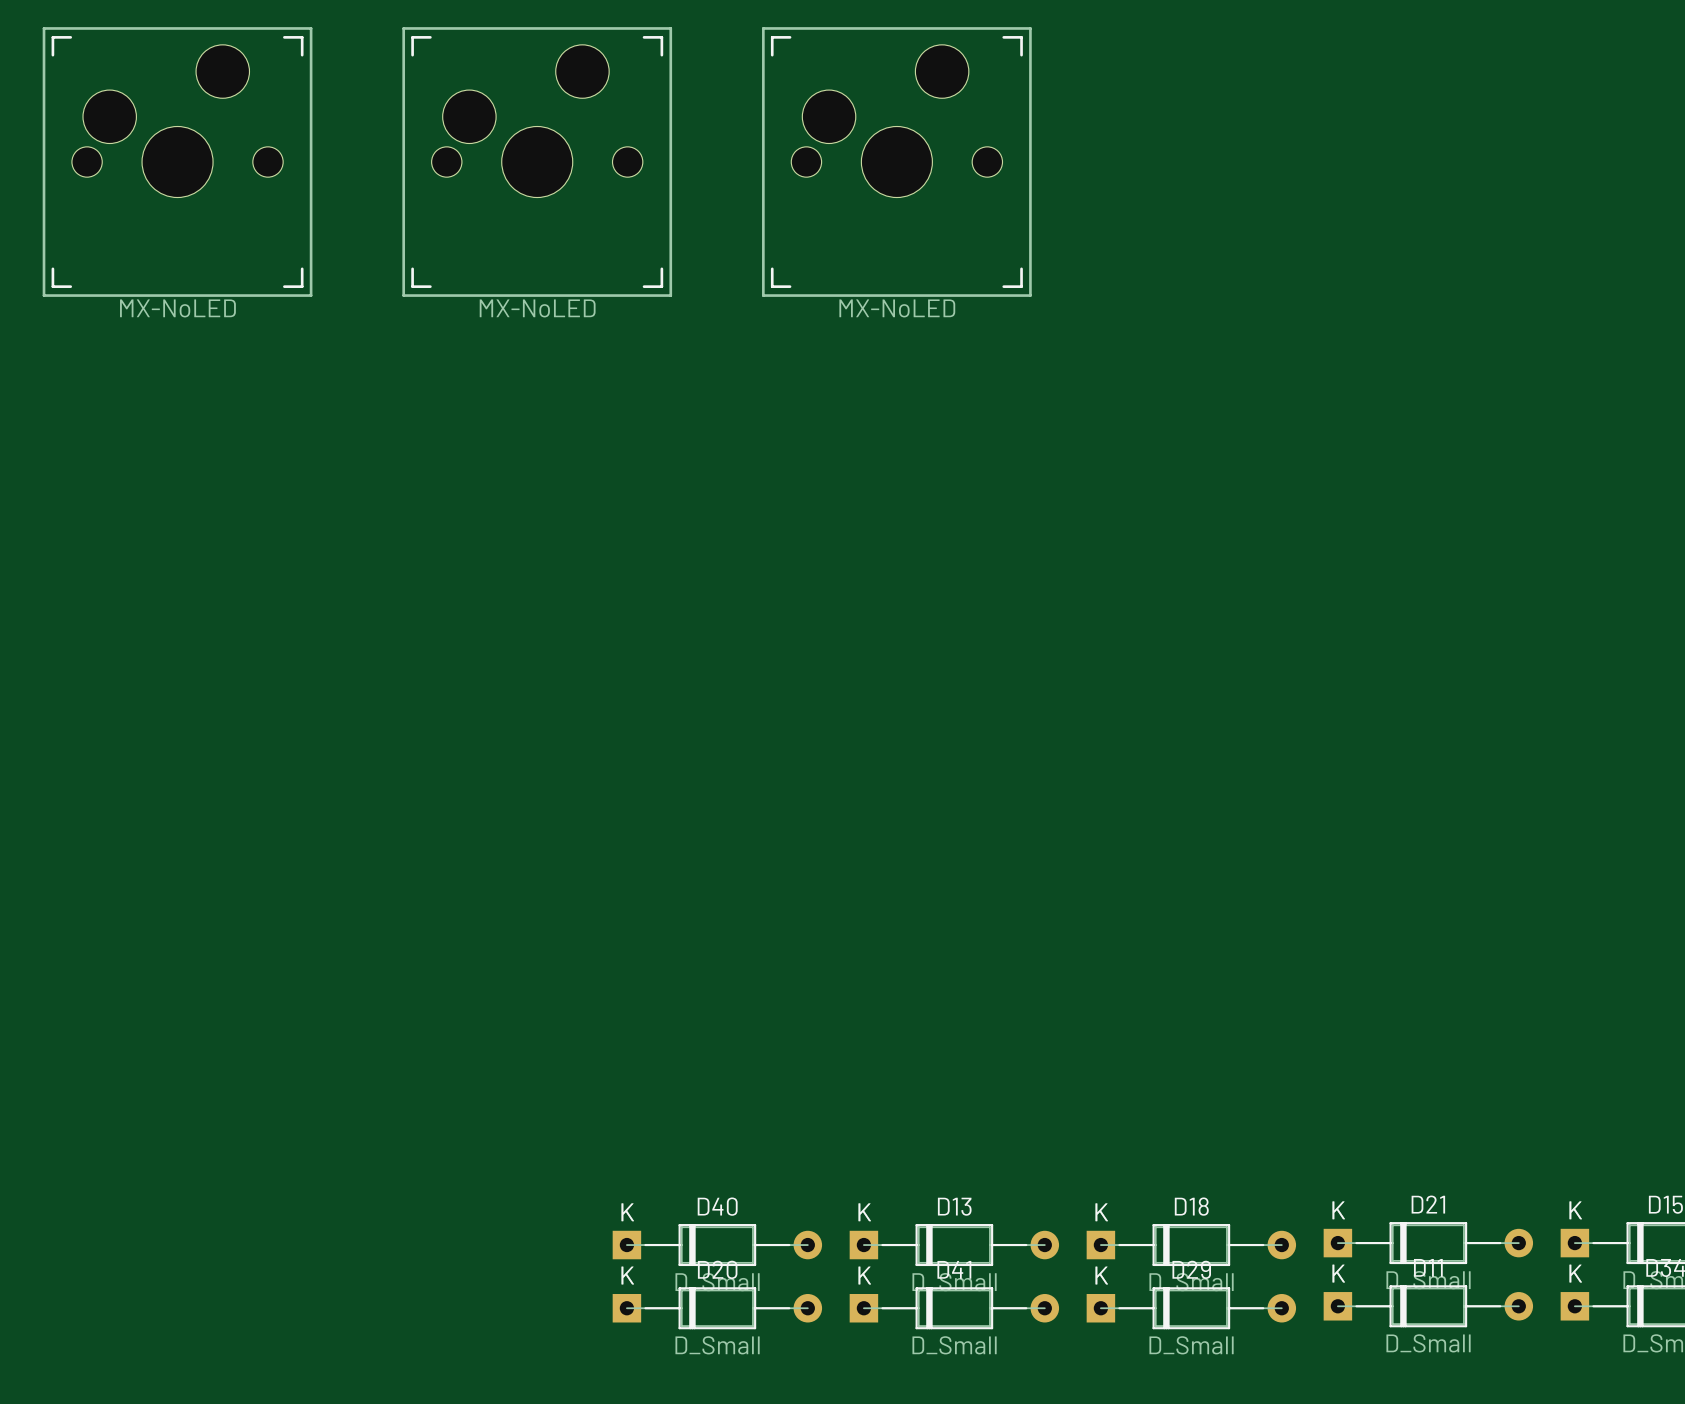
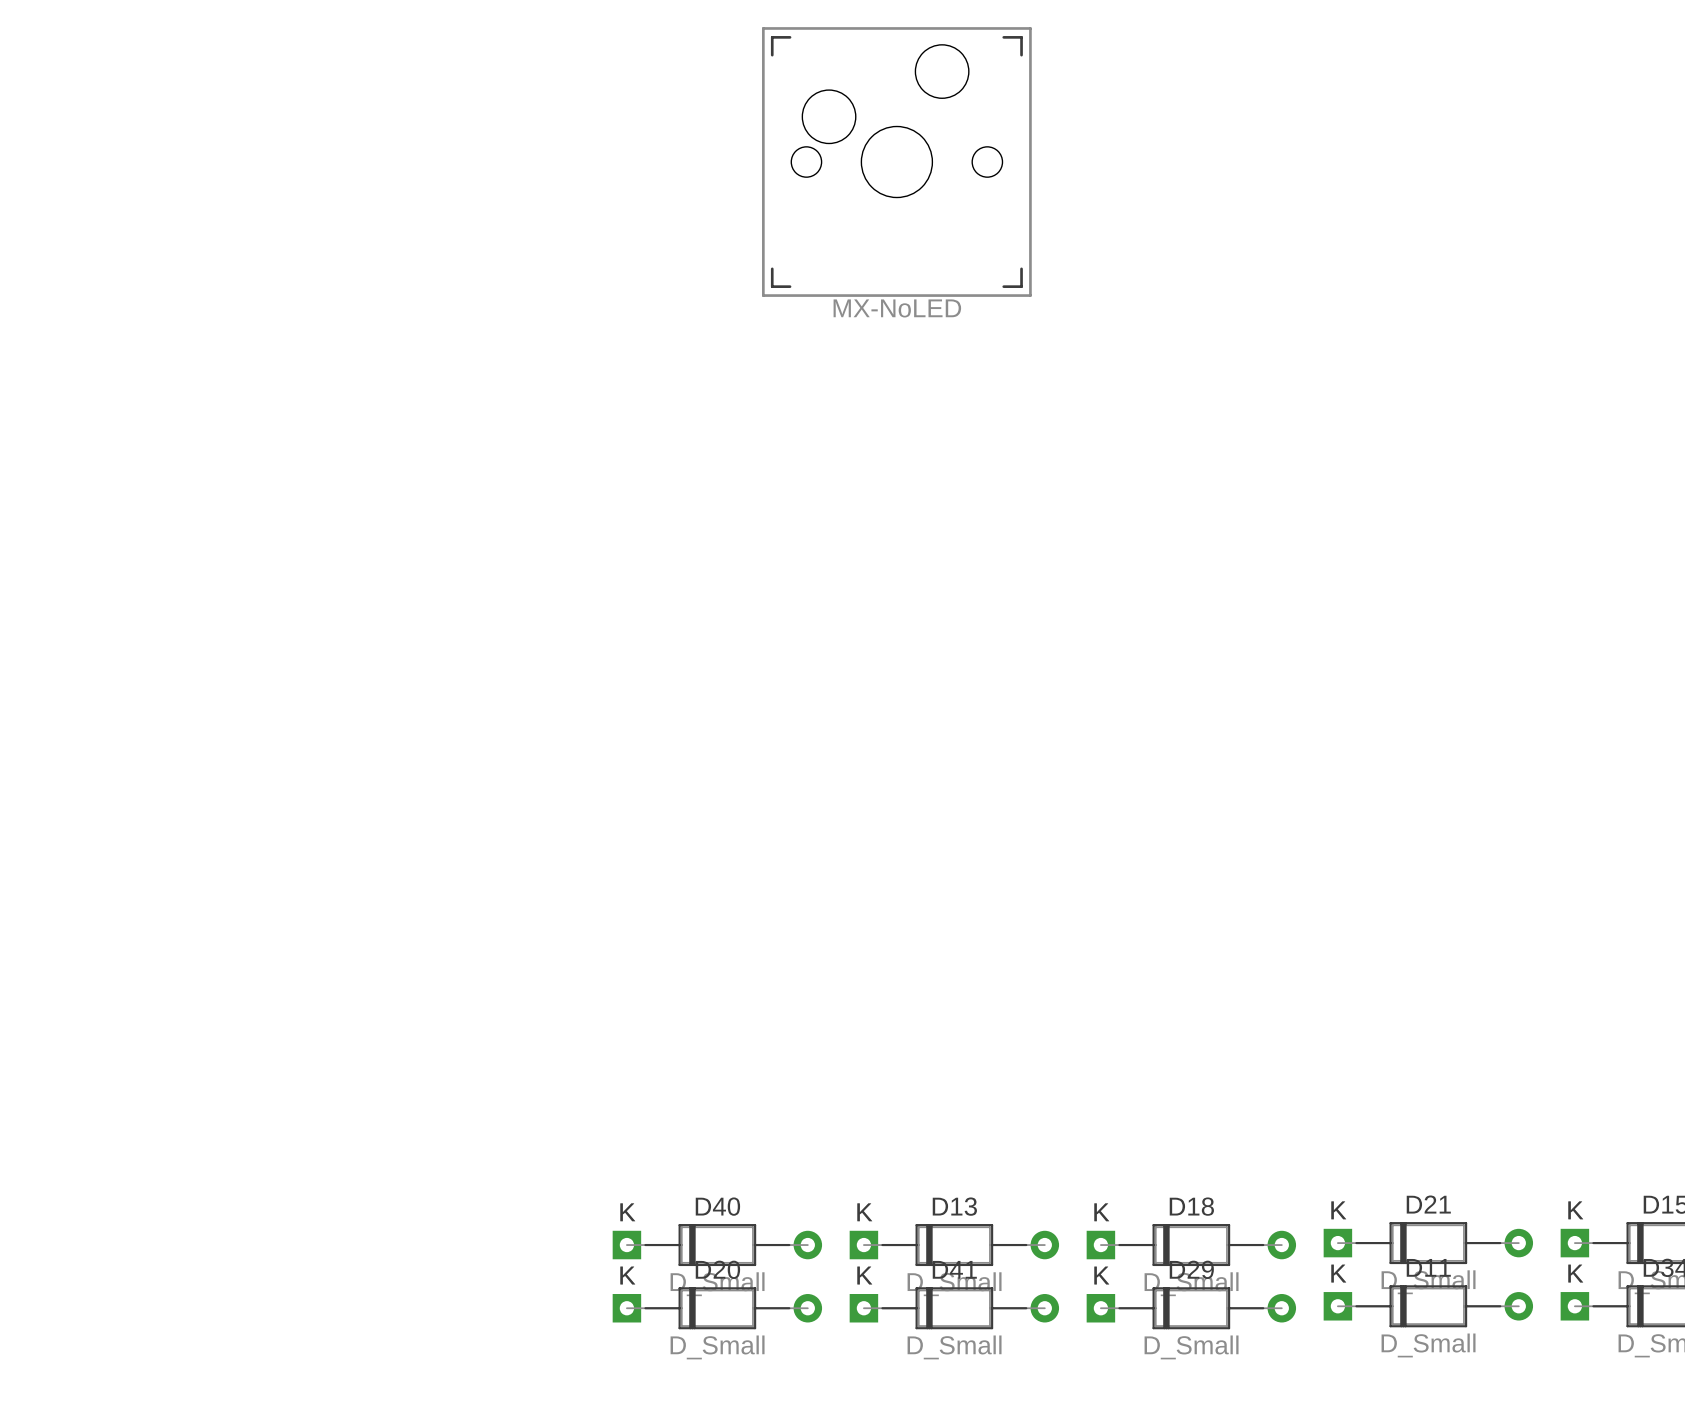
part: MX-NoLED (177, 162) -> none
part: MX-NoLED (537, 162) -> none

